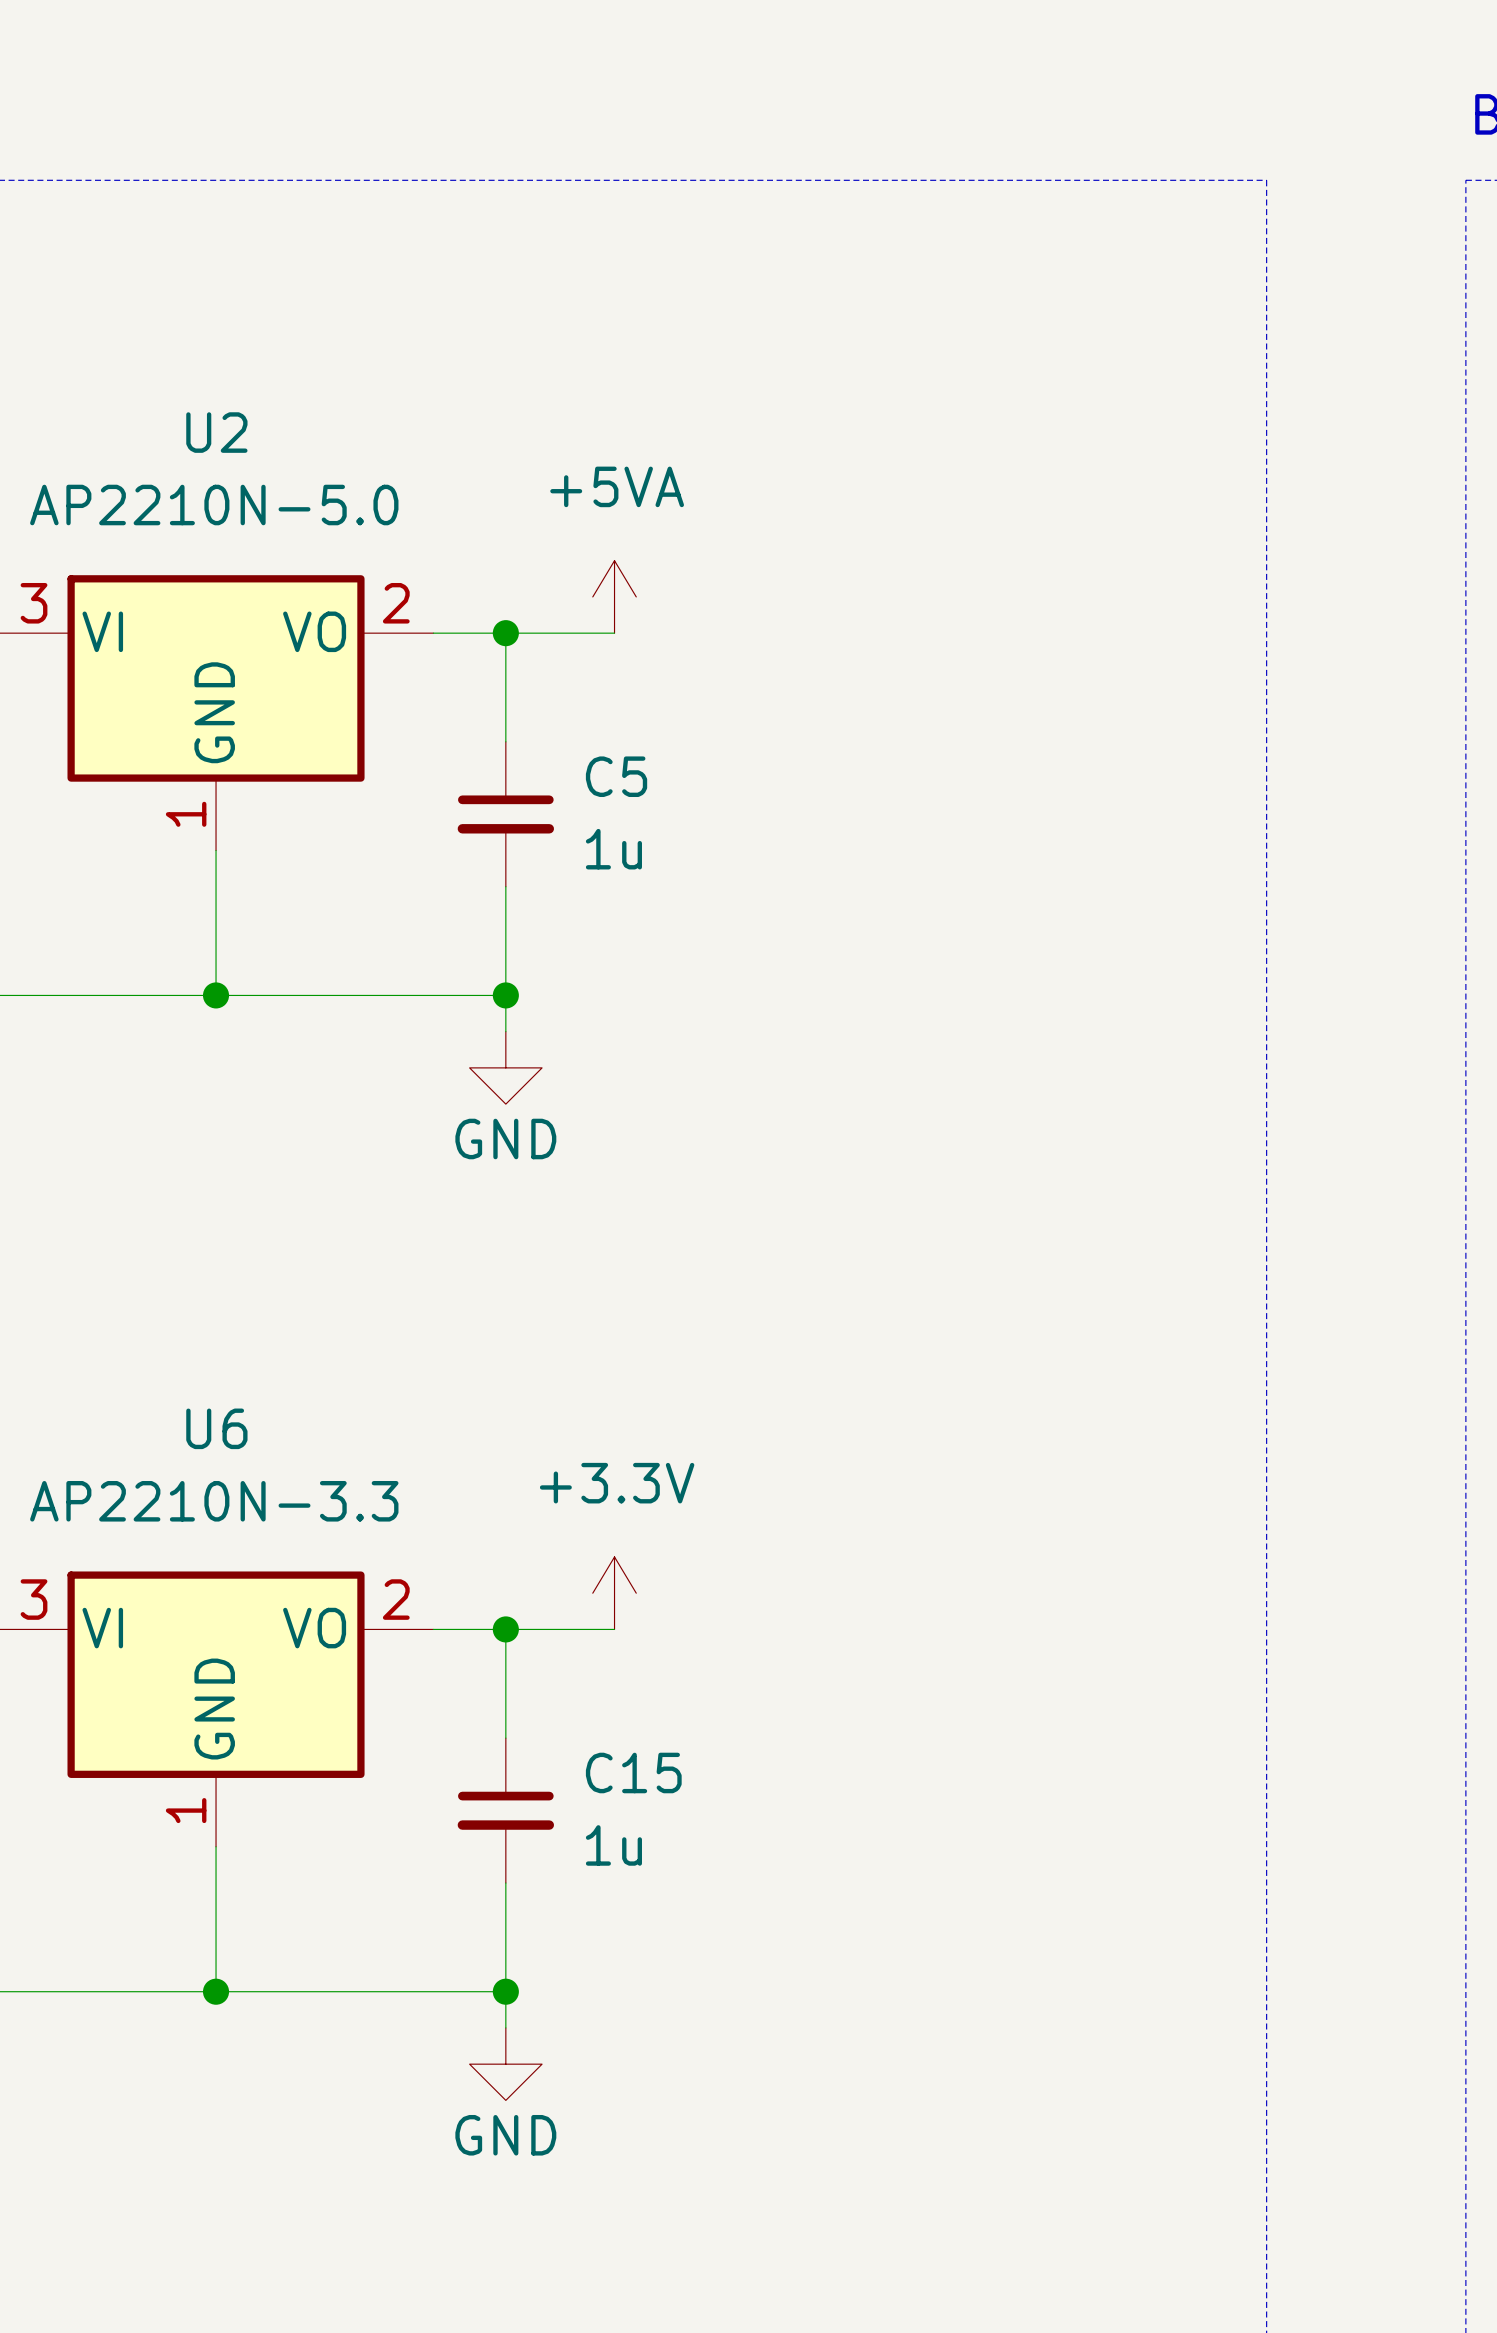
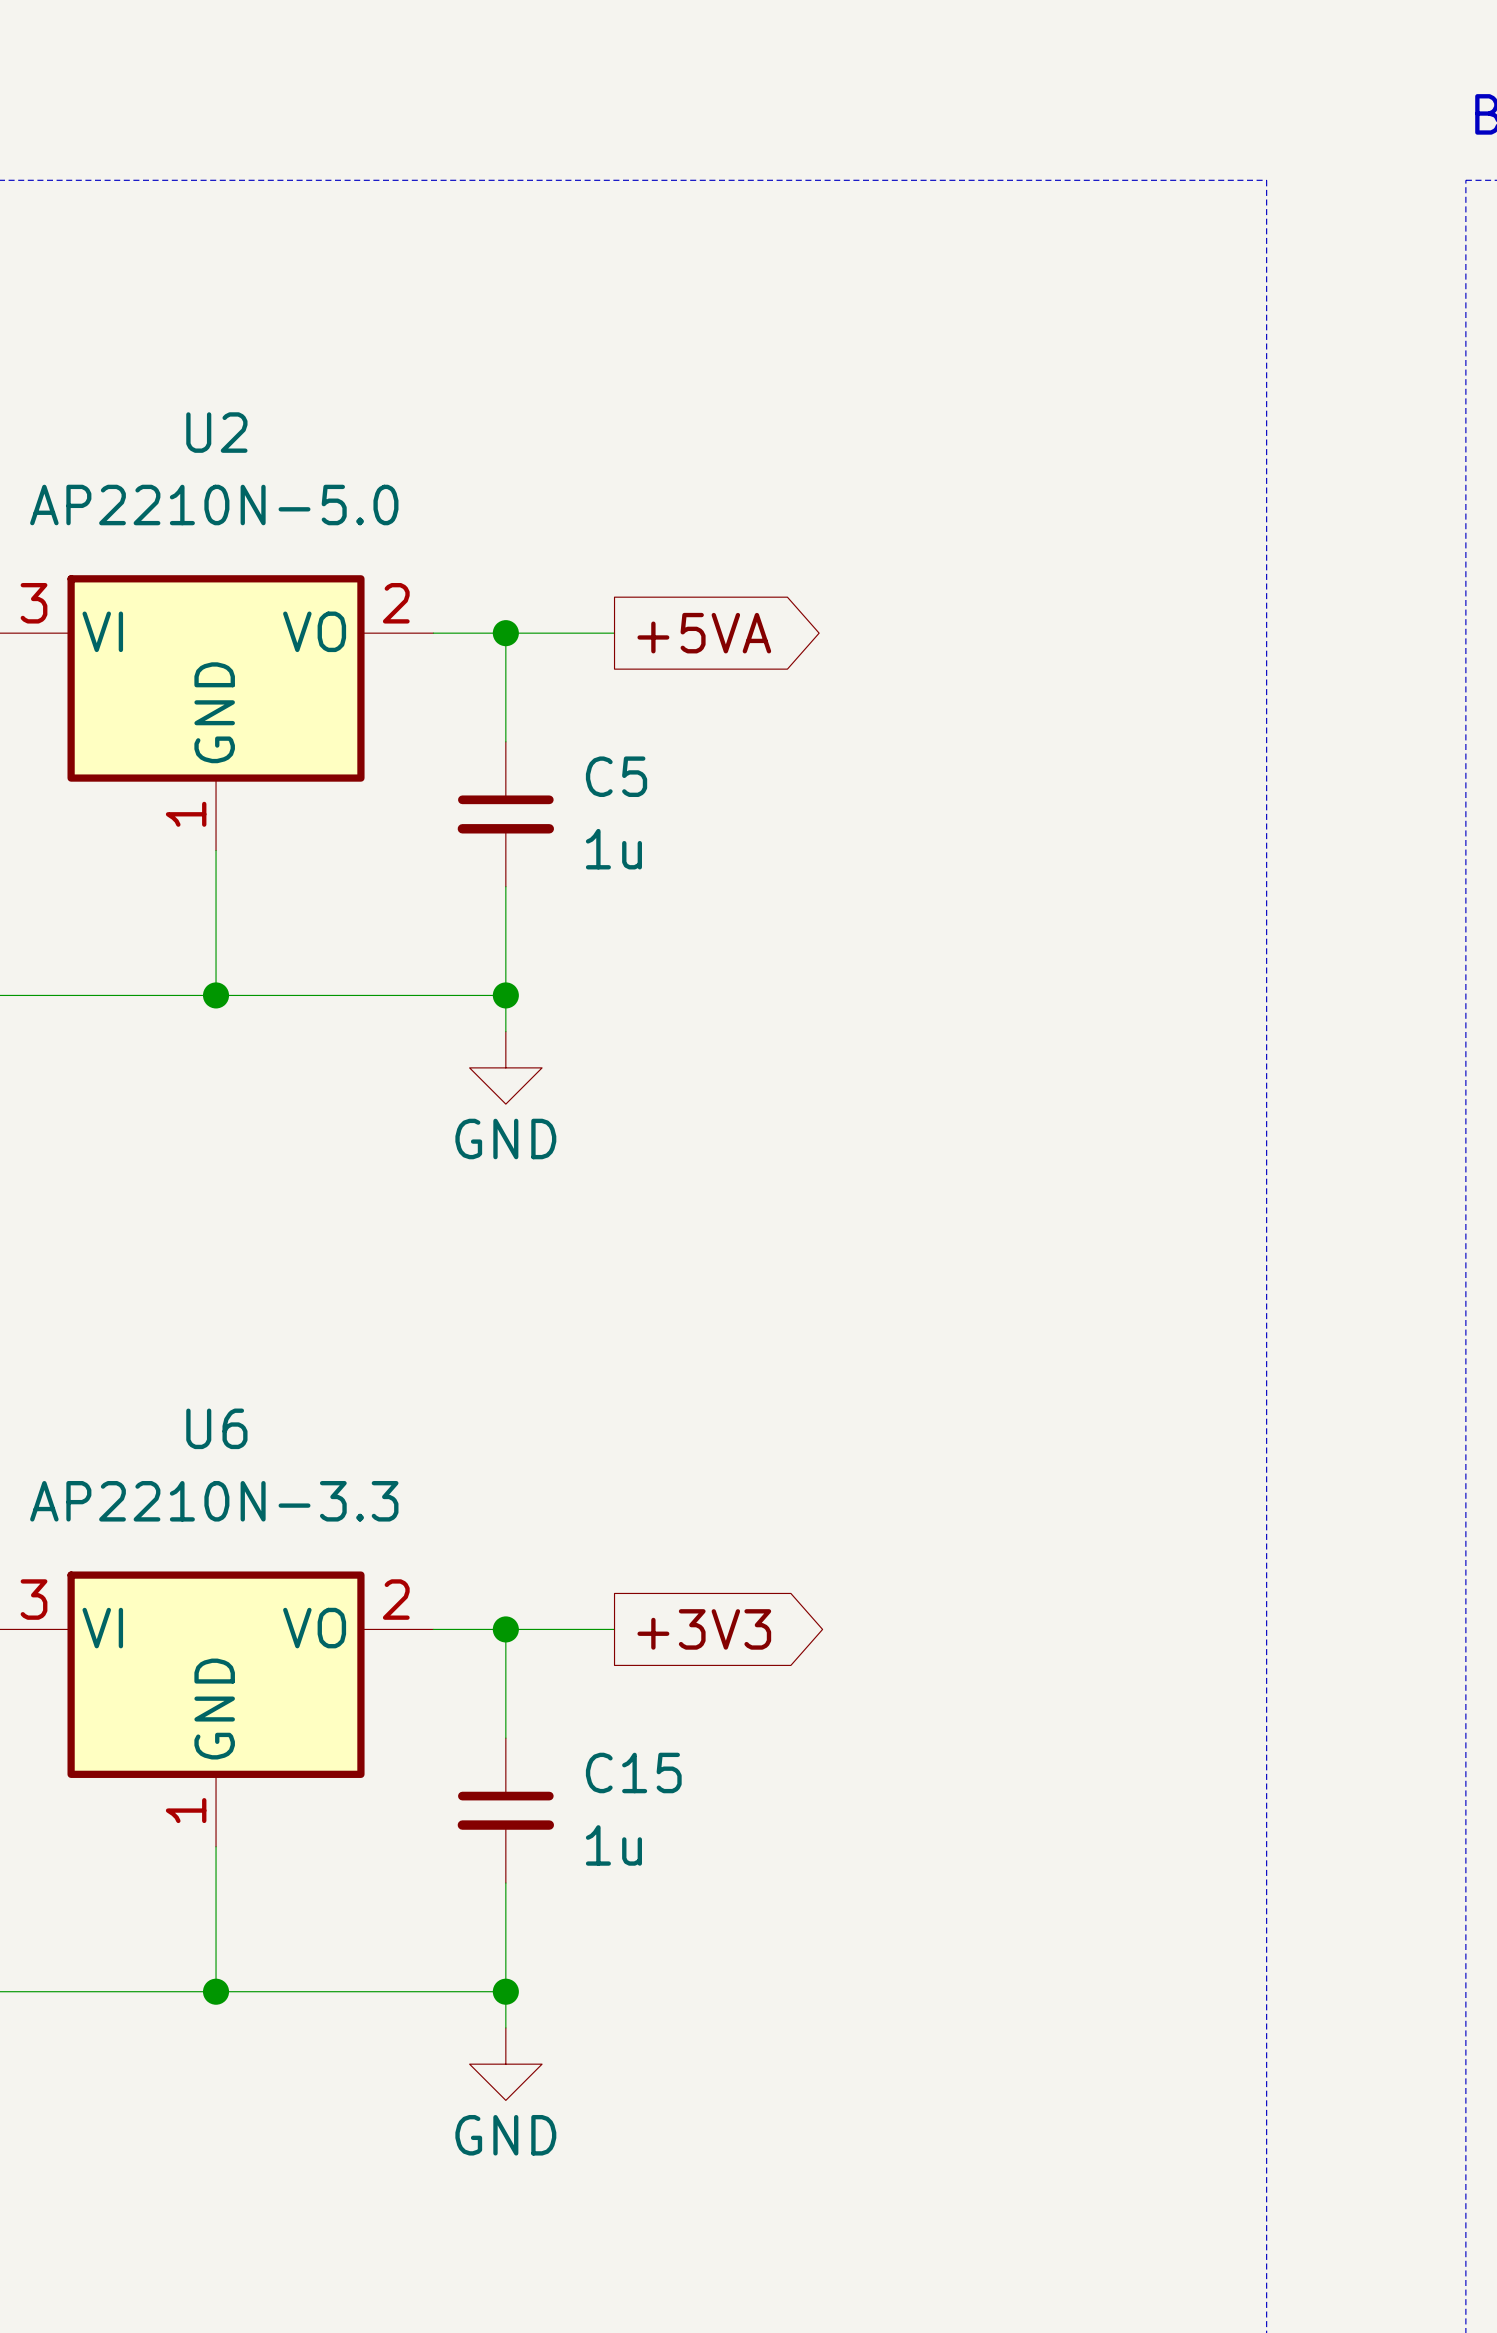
power symbol: +5VA (614, 596) -> none
global label: none -> +5VA (704, 633)
power symbol: +3.3V (614, 1593) -> none
global label: none -> +3V3 (704, 1629)

